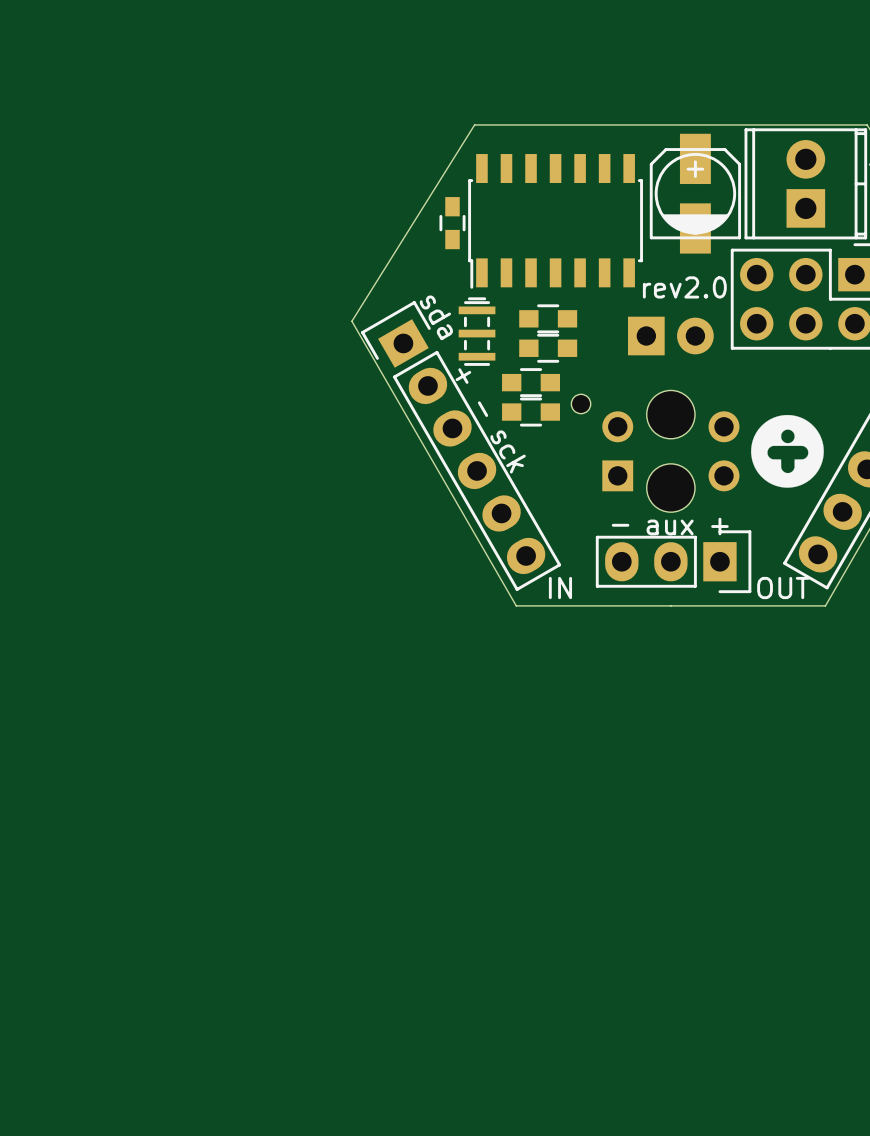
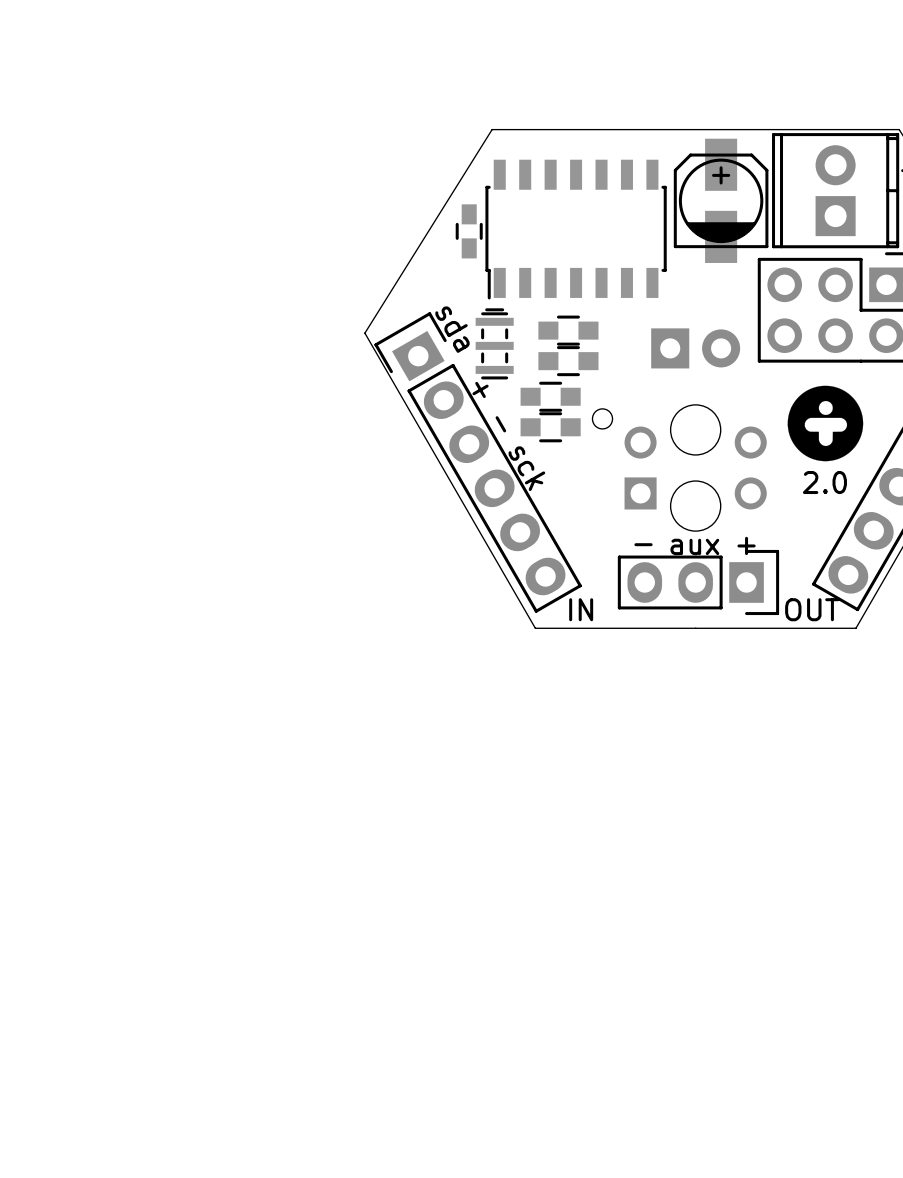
text: rev2.0 (684, 287) -> none
drawing position: (787, 451) -> (825, 423)
text: none -> 2.0 (824, 482)

